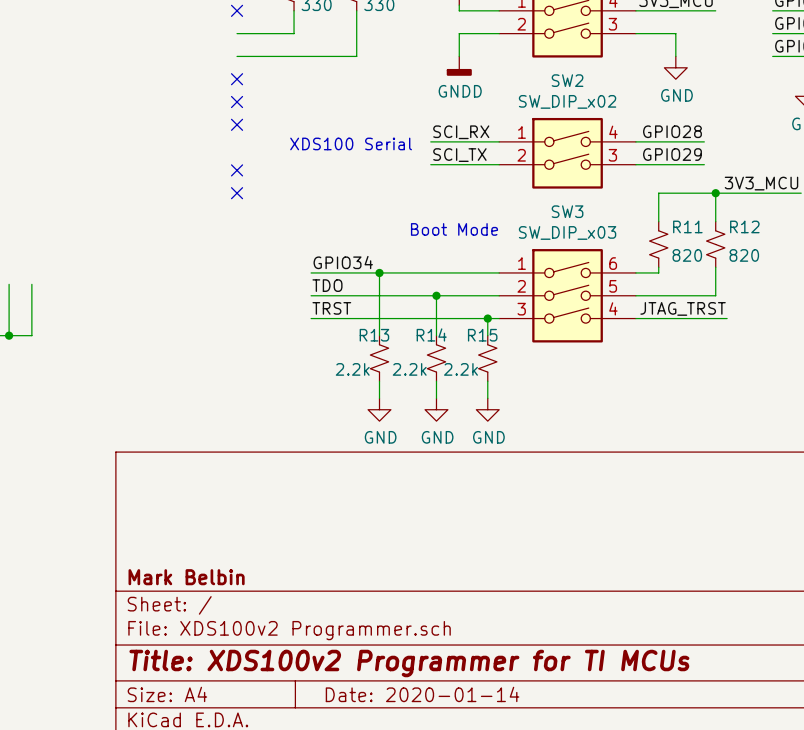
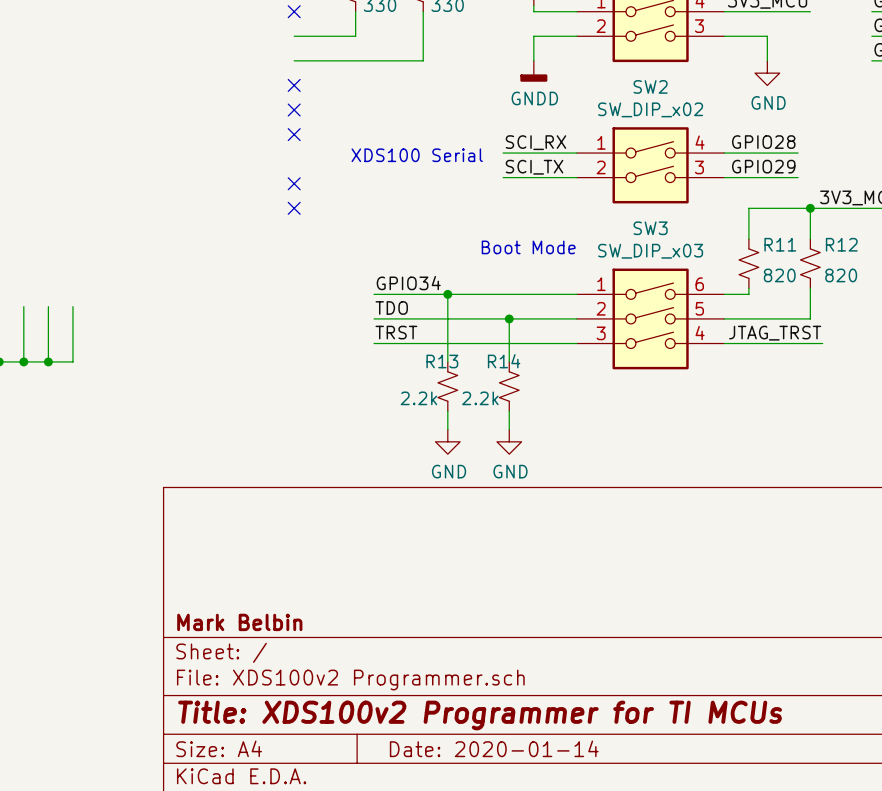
wire: (487, 318) (487, 335) -> none
junction: (487, 318) -> none
R15: 2.2k (487, 358) -> none
wire: (487, 381) (487, 398) -> none
power symbol: GND (487, 409) -> none

